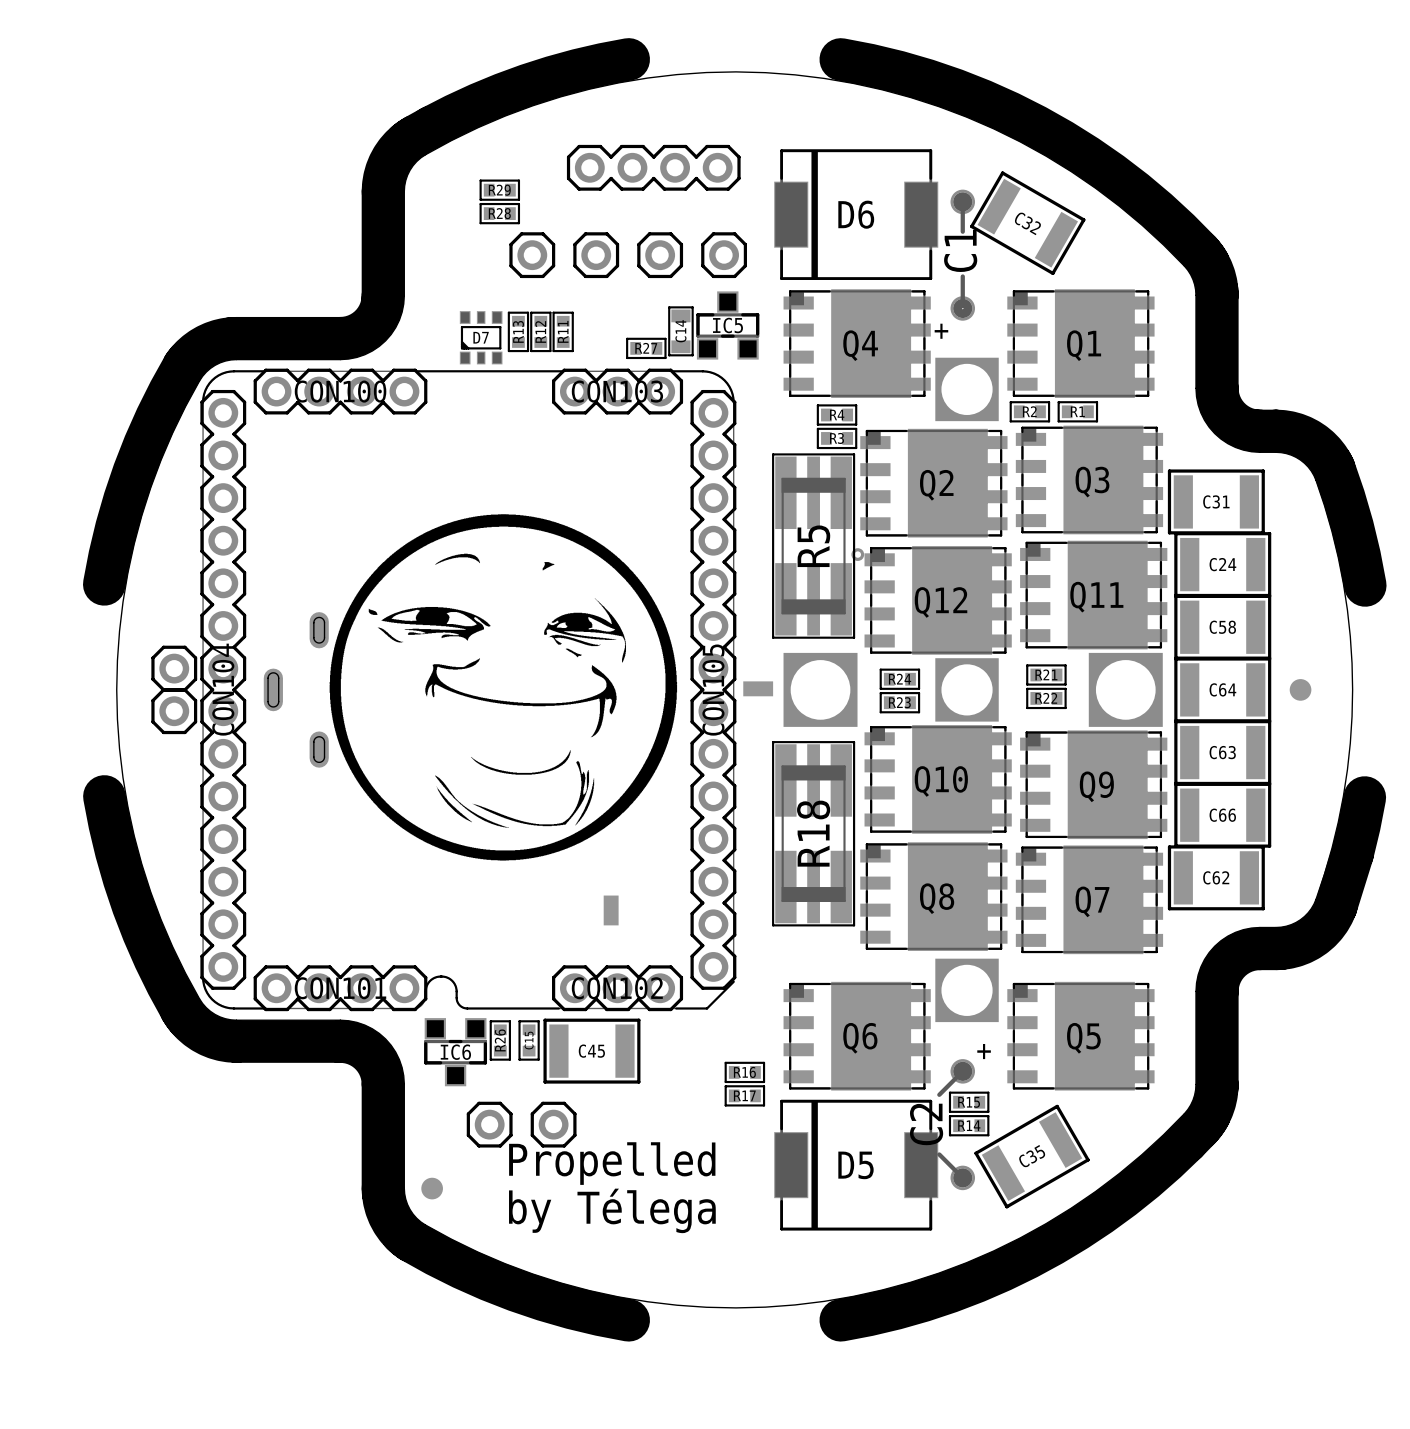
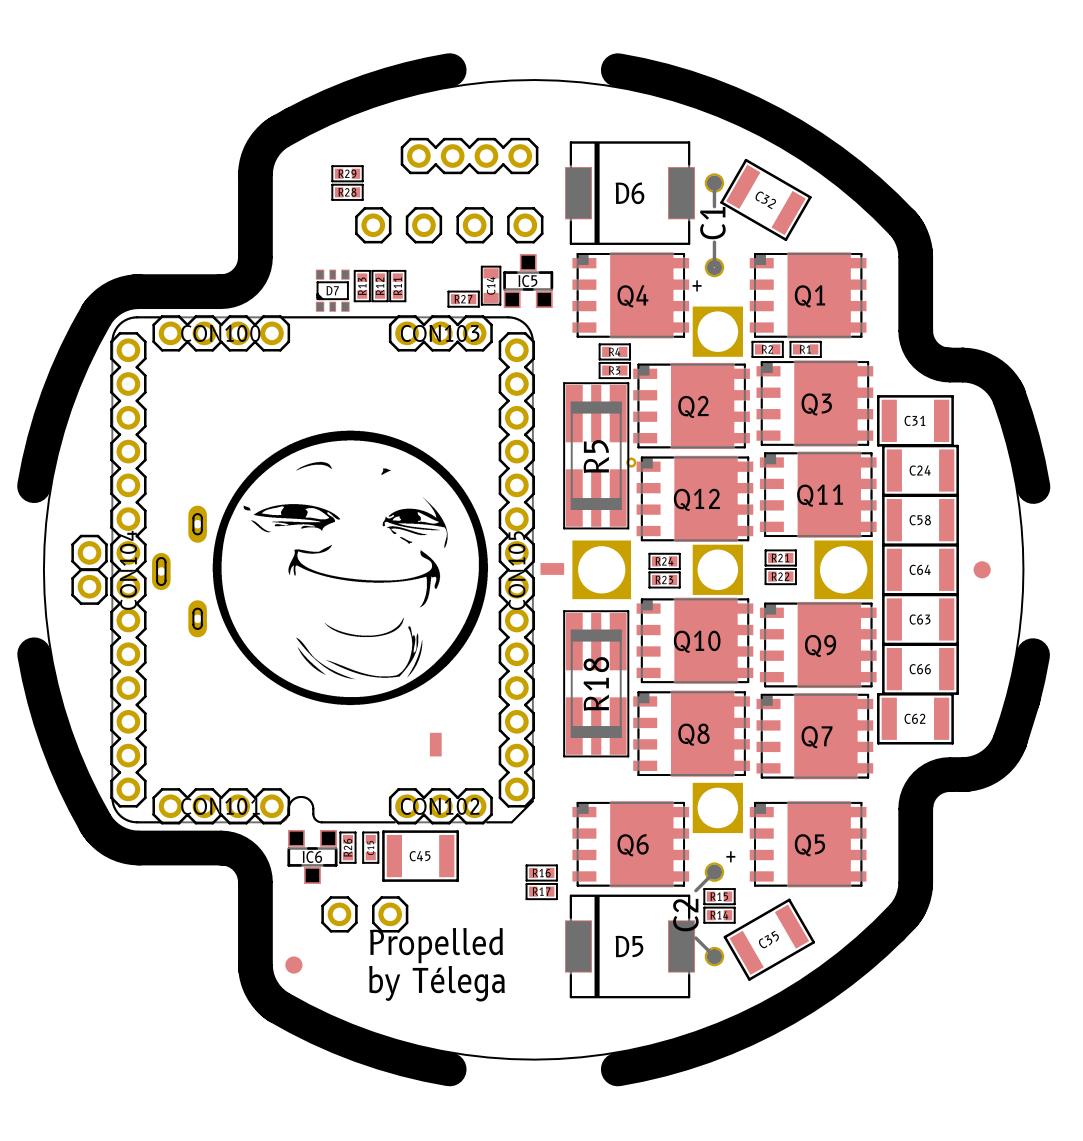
part footprint: [263, 612, 329, 768] -> [152, 505, 207, 638]

